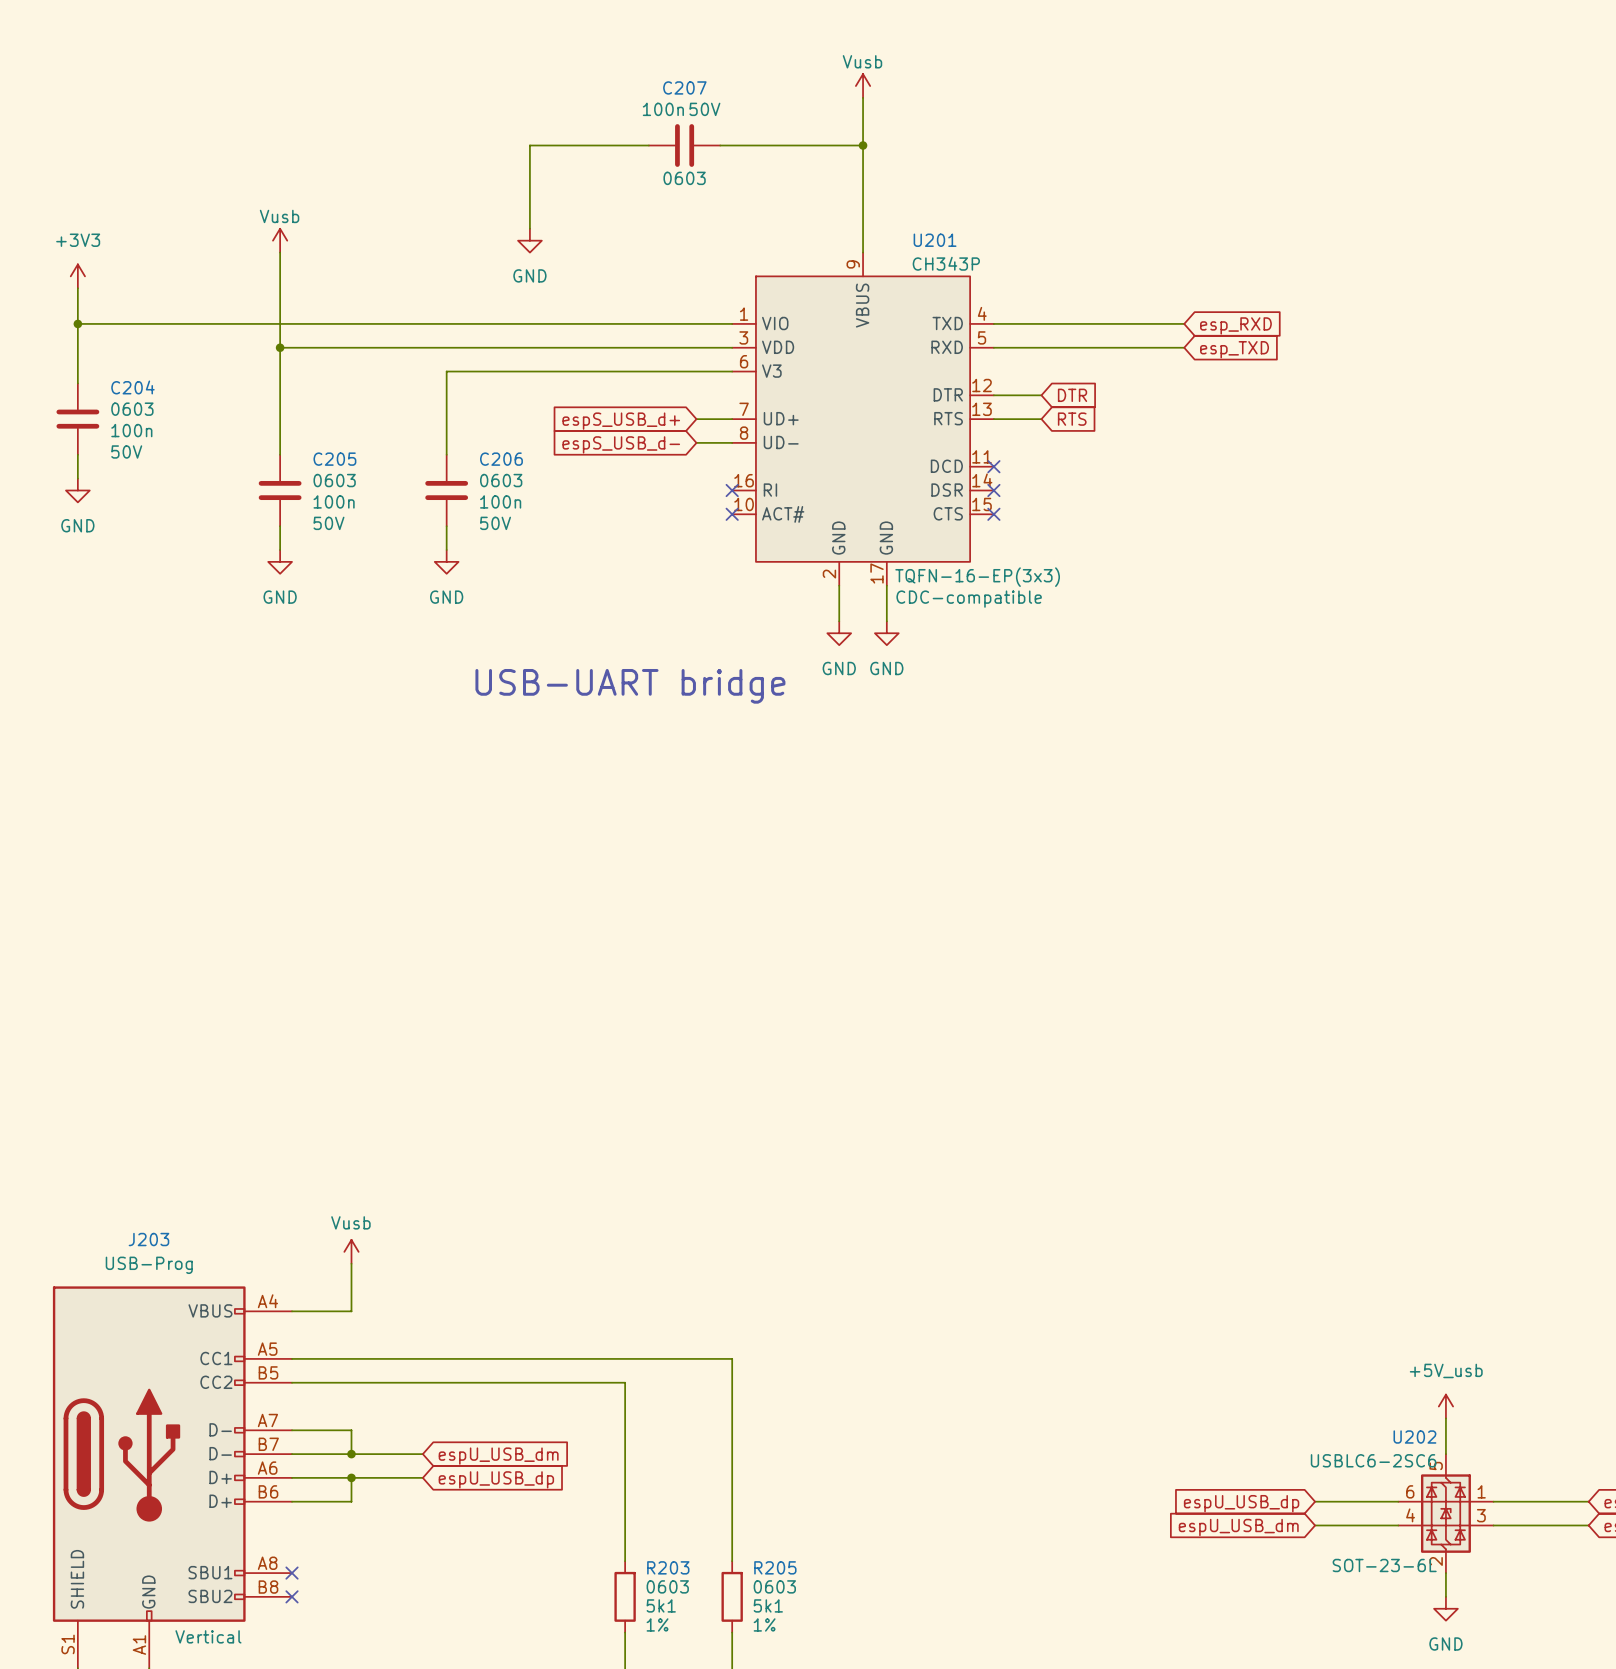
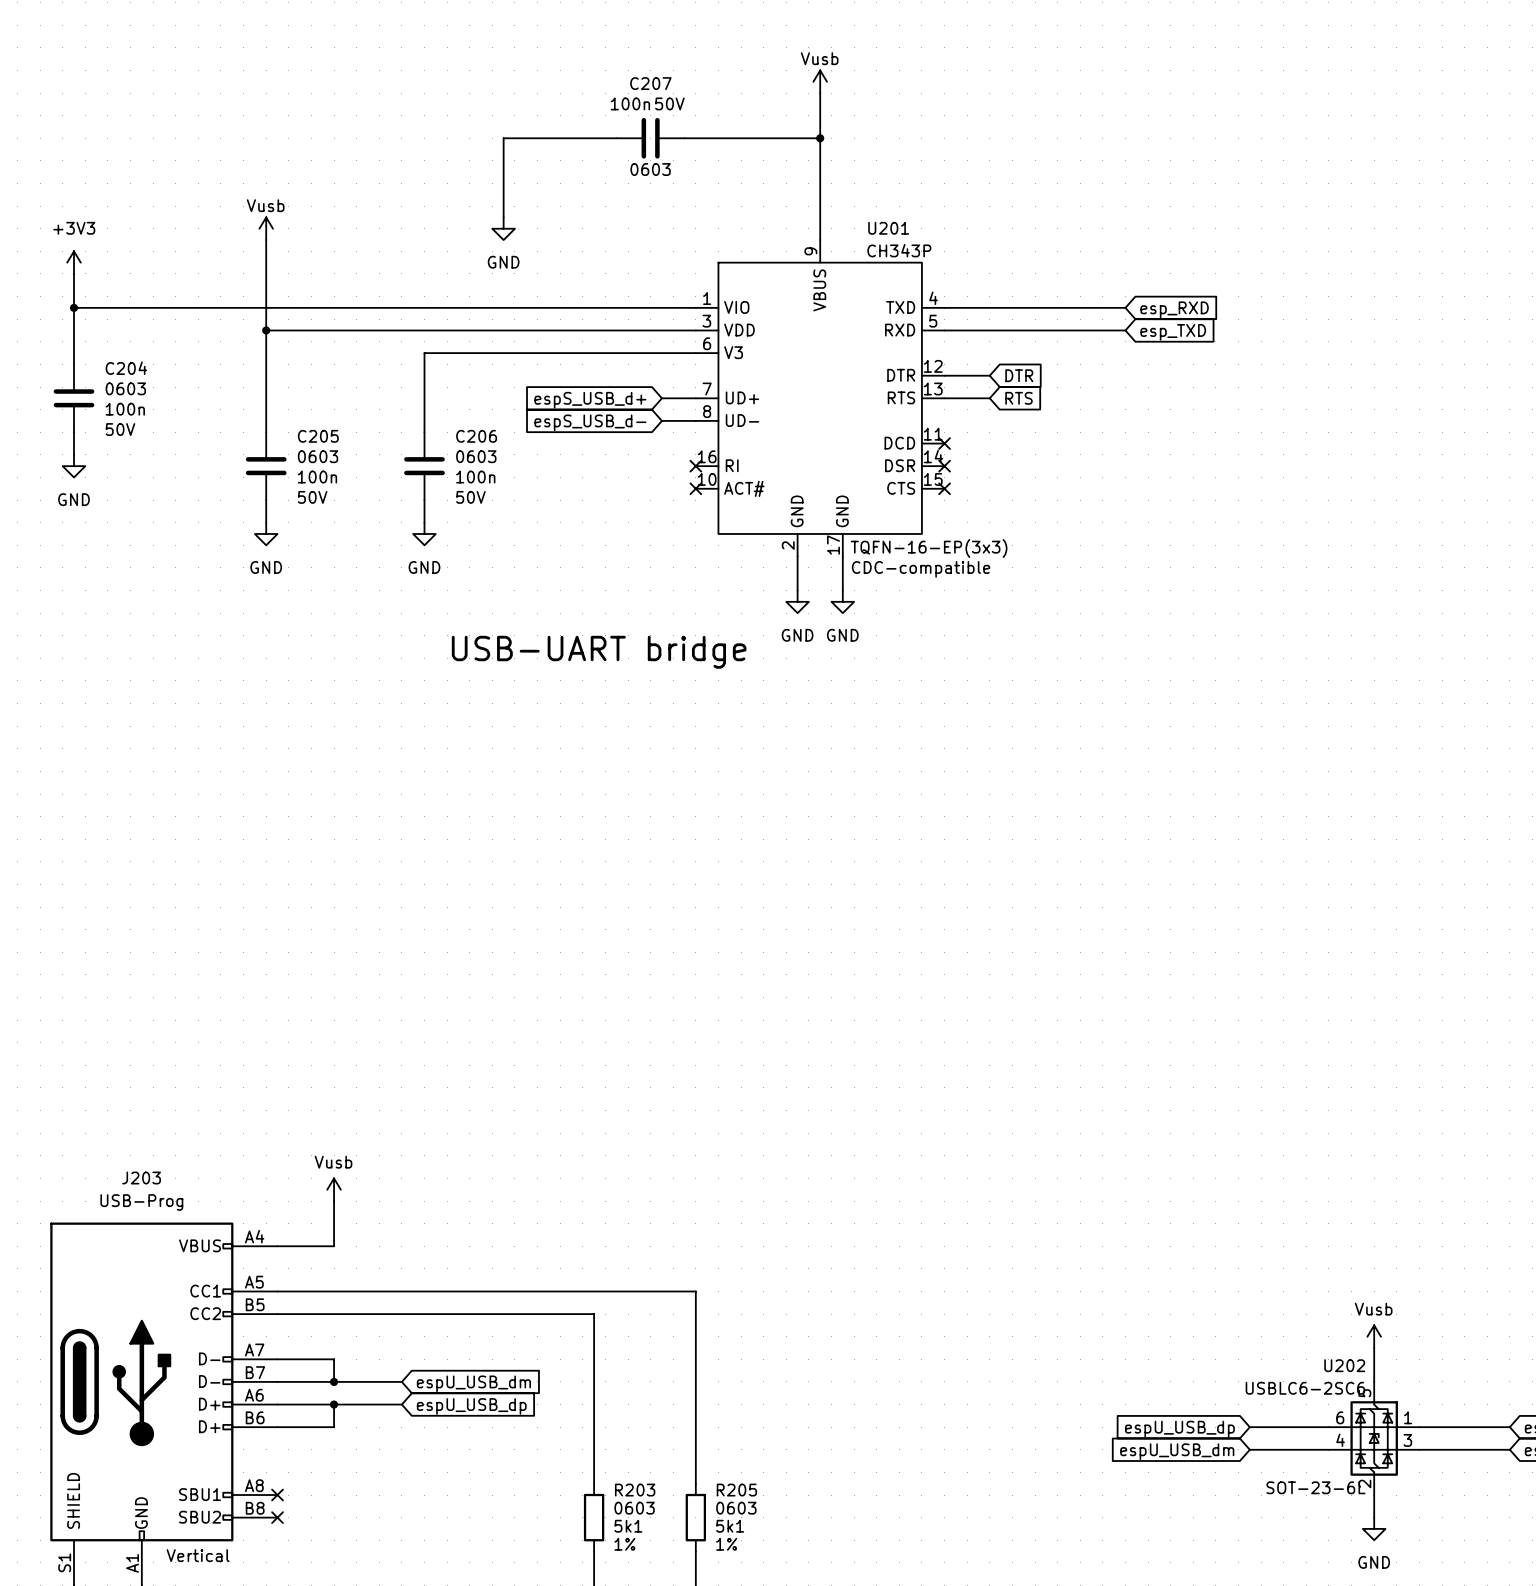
power symbol: +5V_usb (1445, 1406) -> Vusb (1374, 1336)

